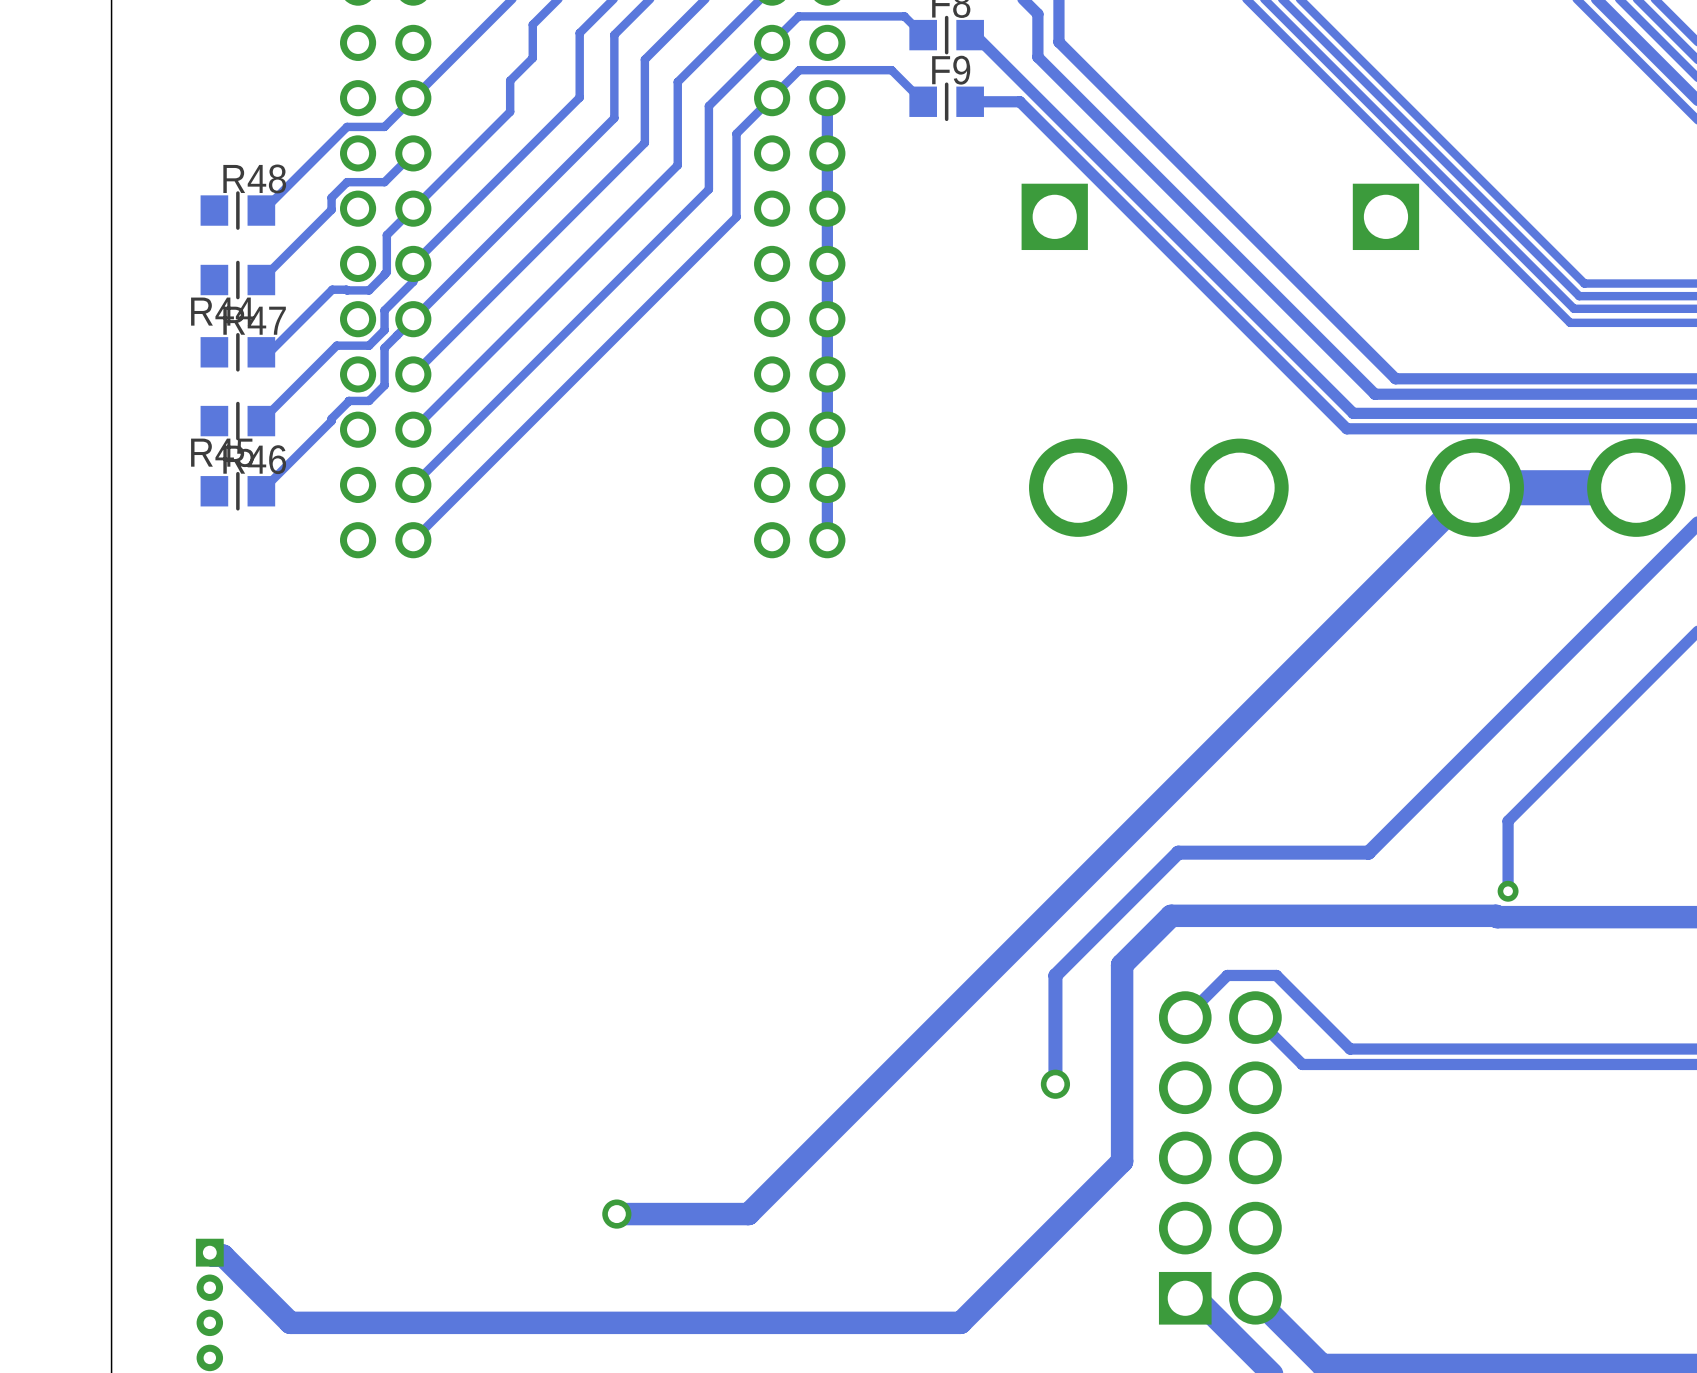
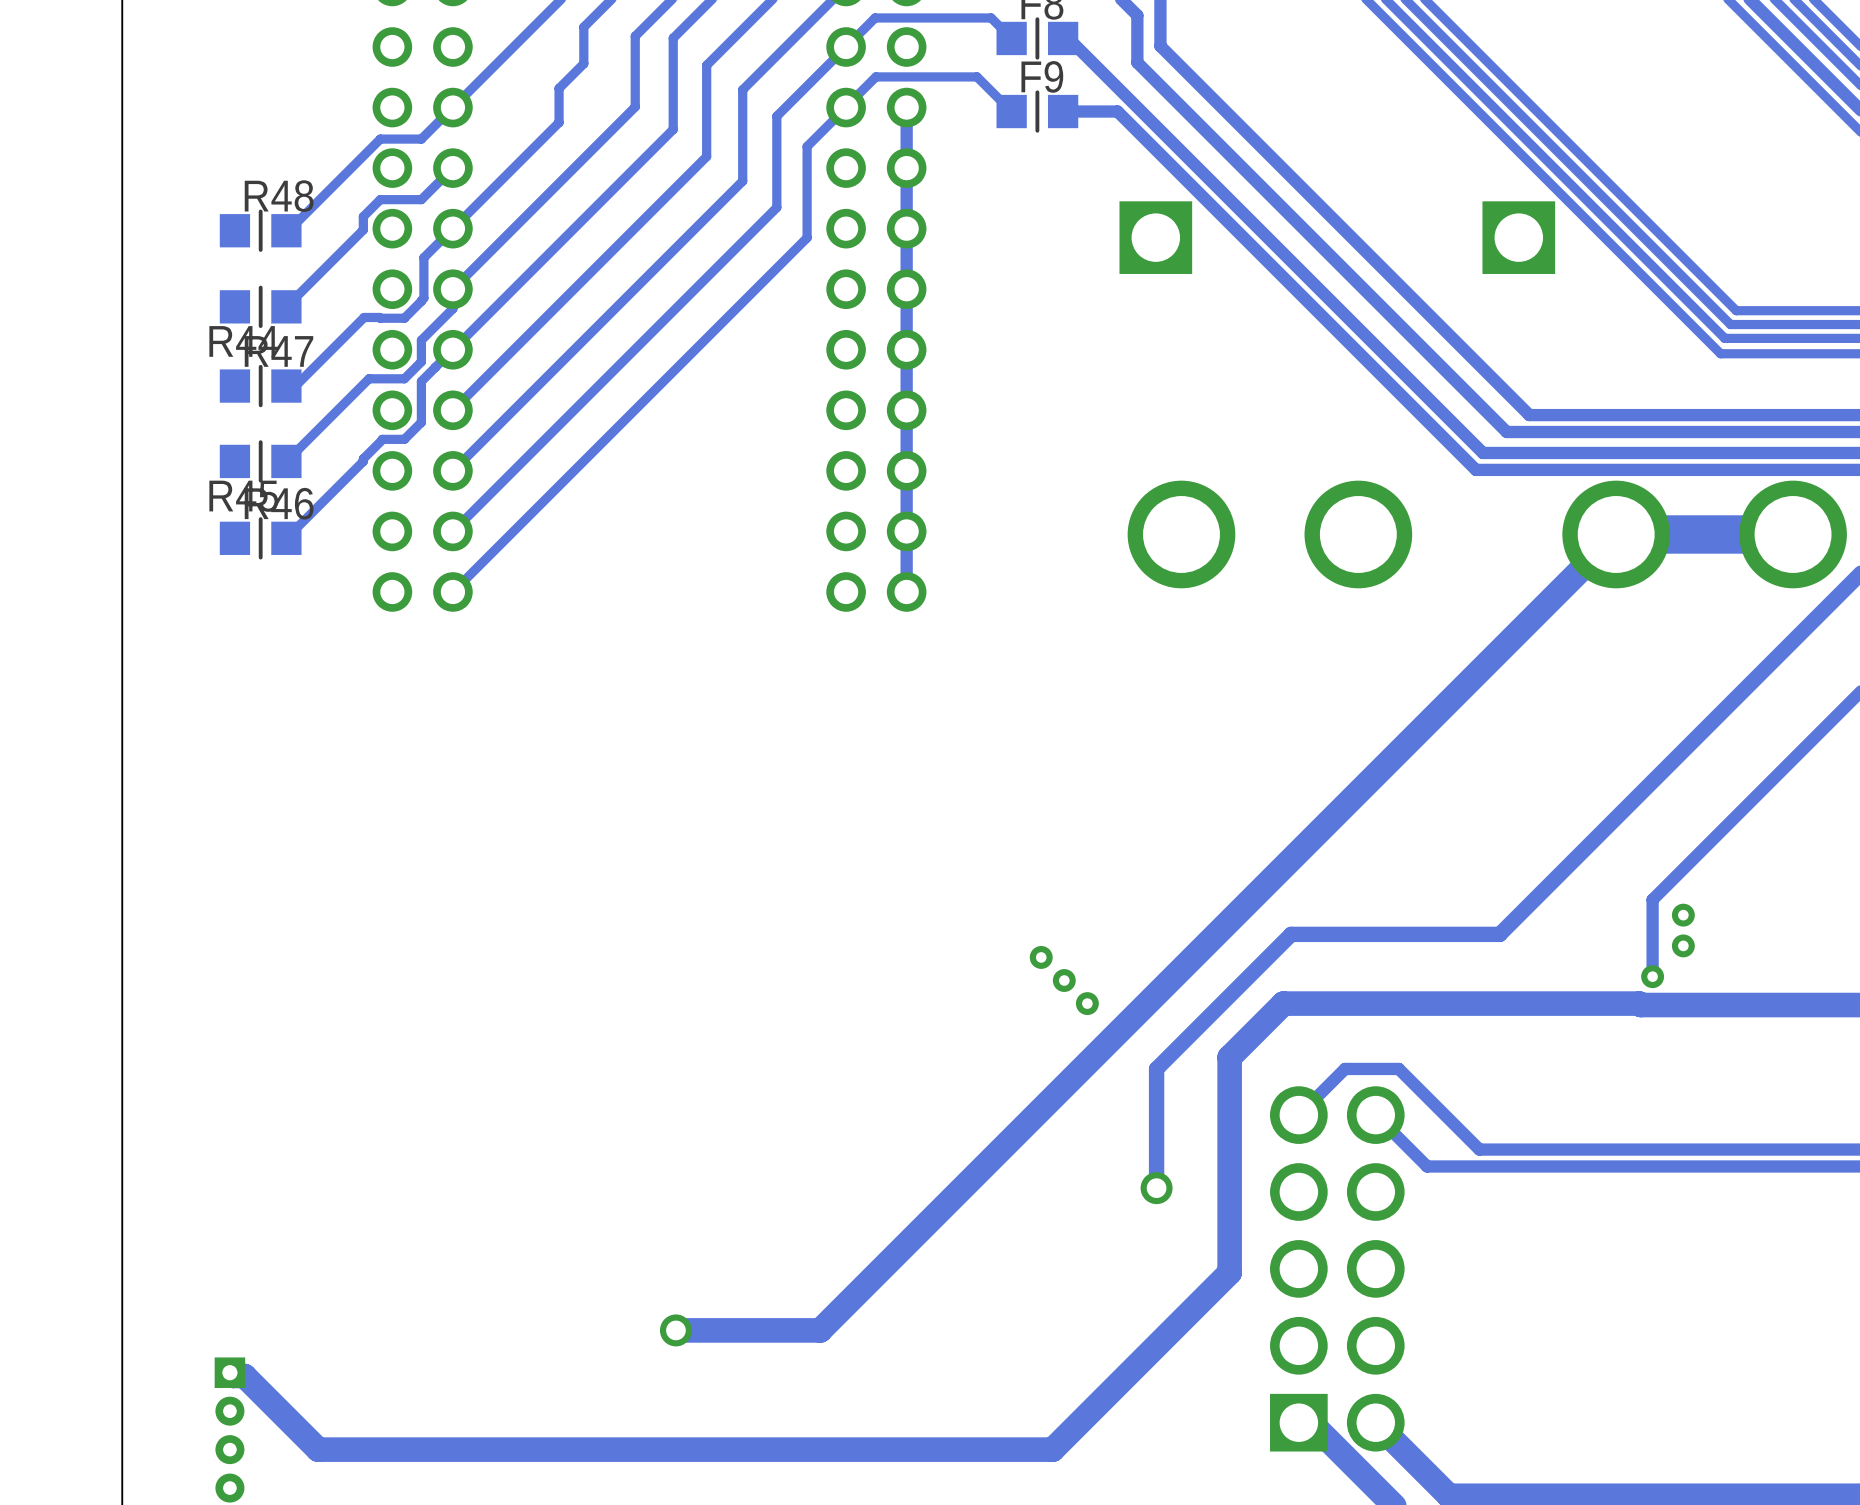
via: none -> (1683, 915)
via: none -> (1683, 945)
via: none -> (1041, 957)
via: none -> (1064, 980)
via: none -> (1087, 1003)

